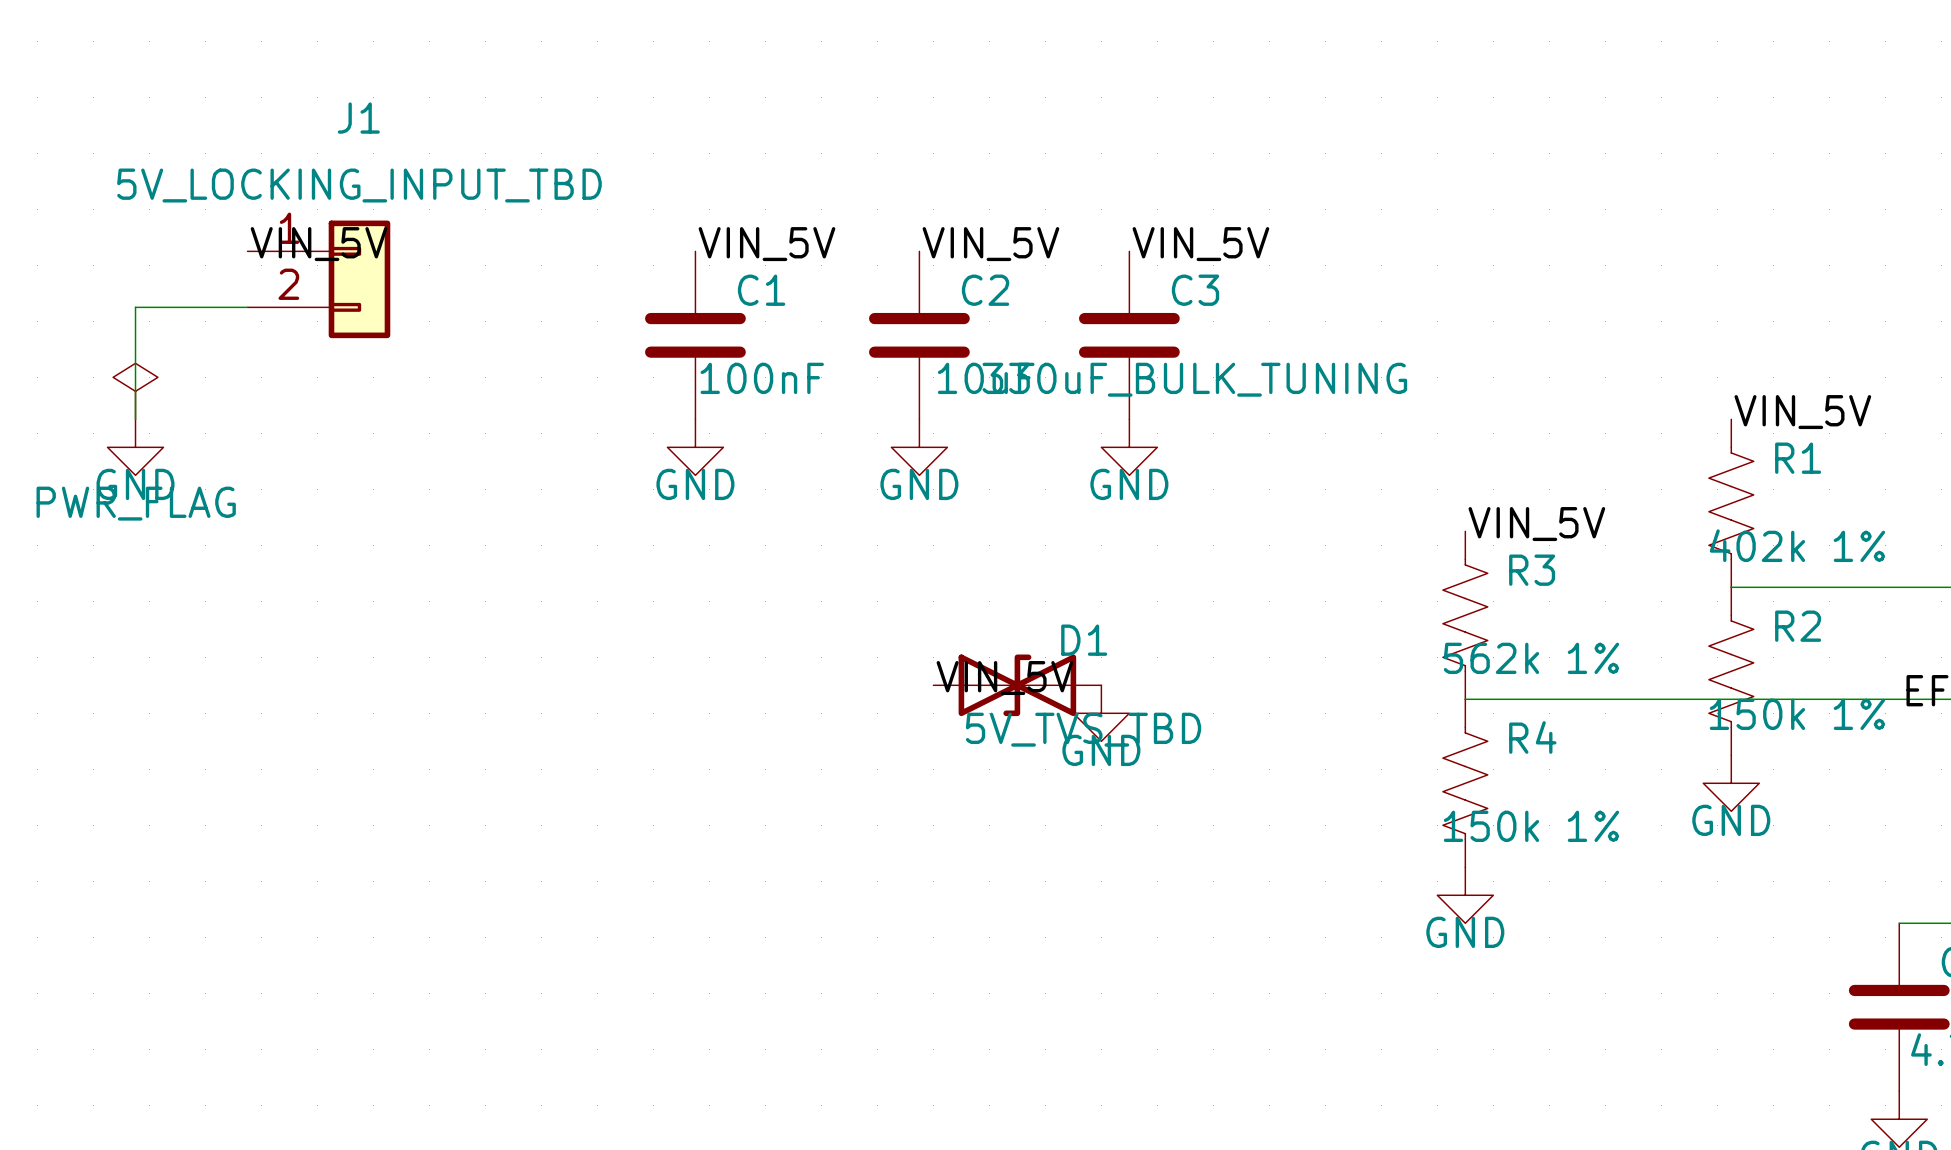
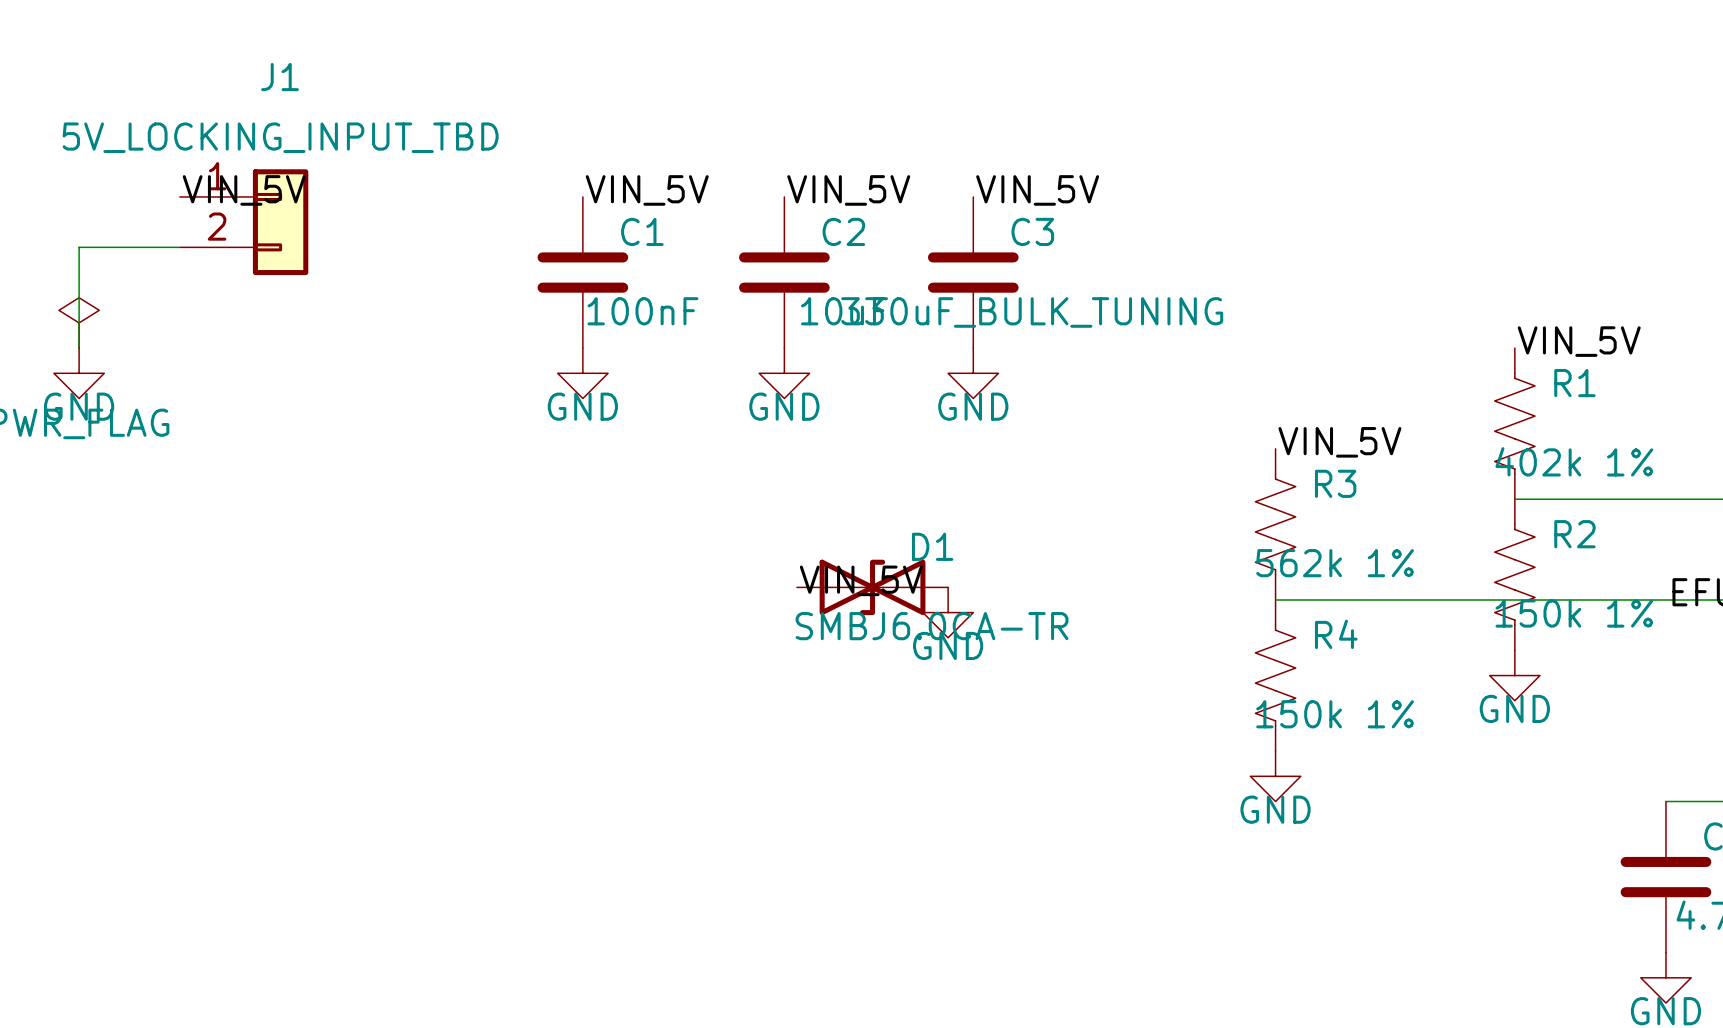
D1 value: 5V_TVS_TBD (1083, 729) -> SMBJ6.0CA-TR (932, 626)

